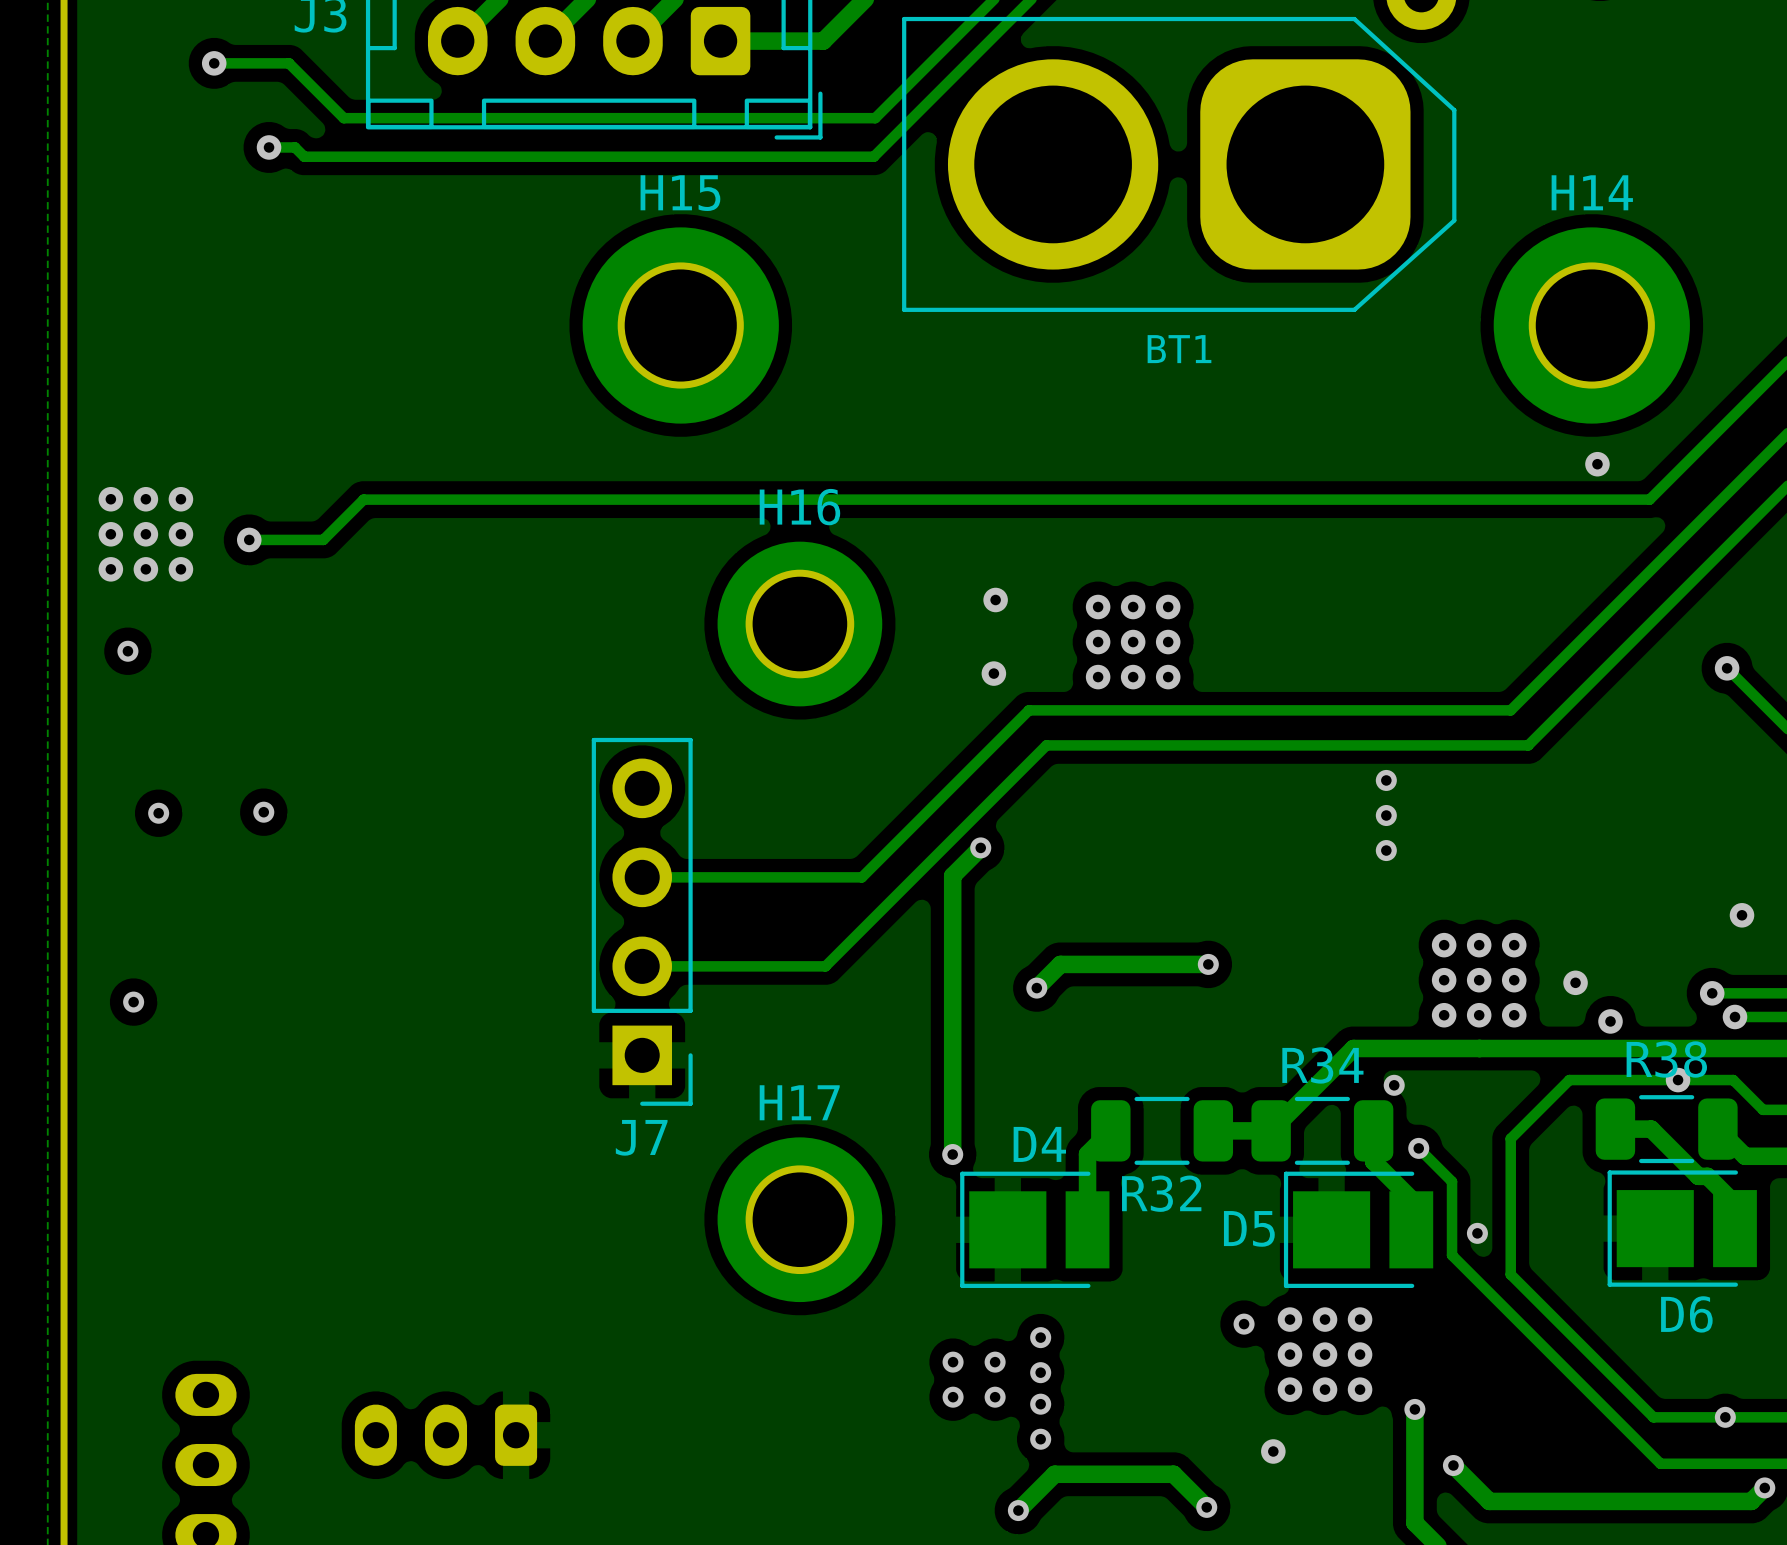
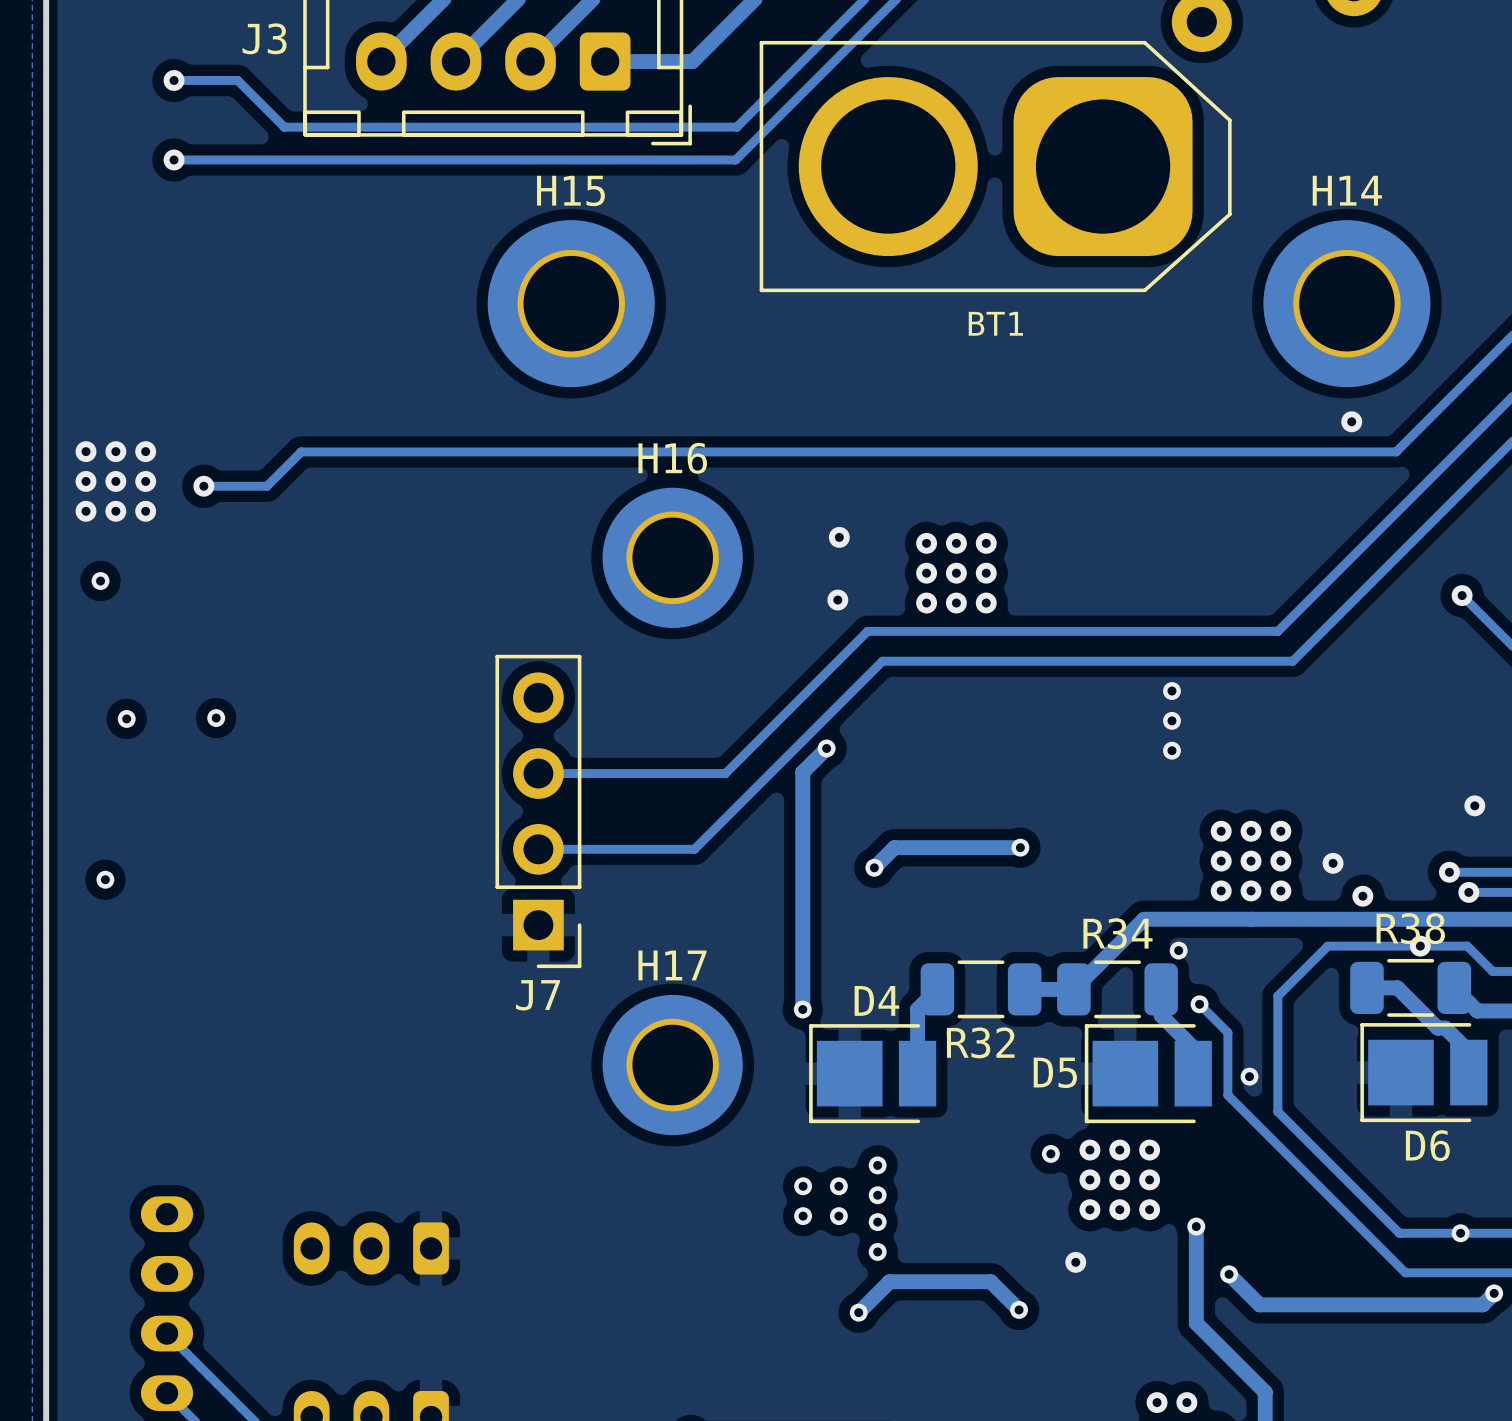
track: (269, 147) (295, 147) (304, 156) -> (174, 159) (250, 159)
via position: (269, 147) -> (174, 159)

